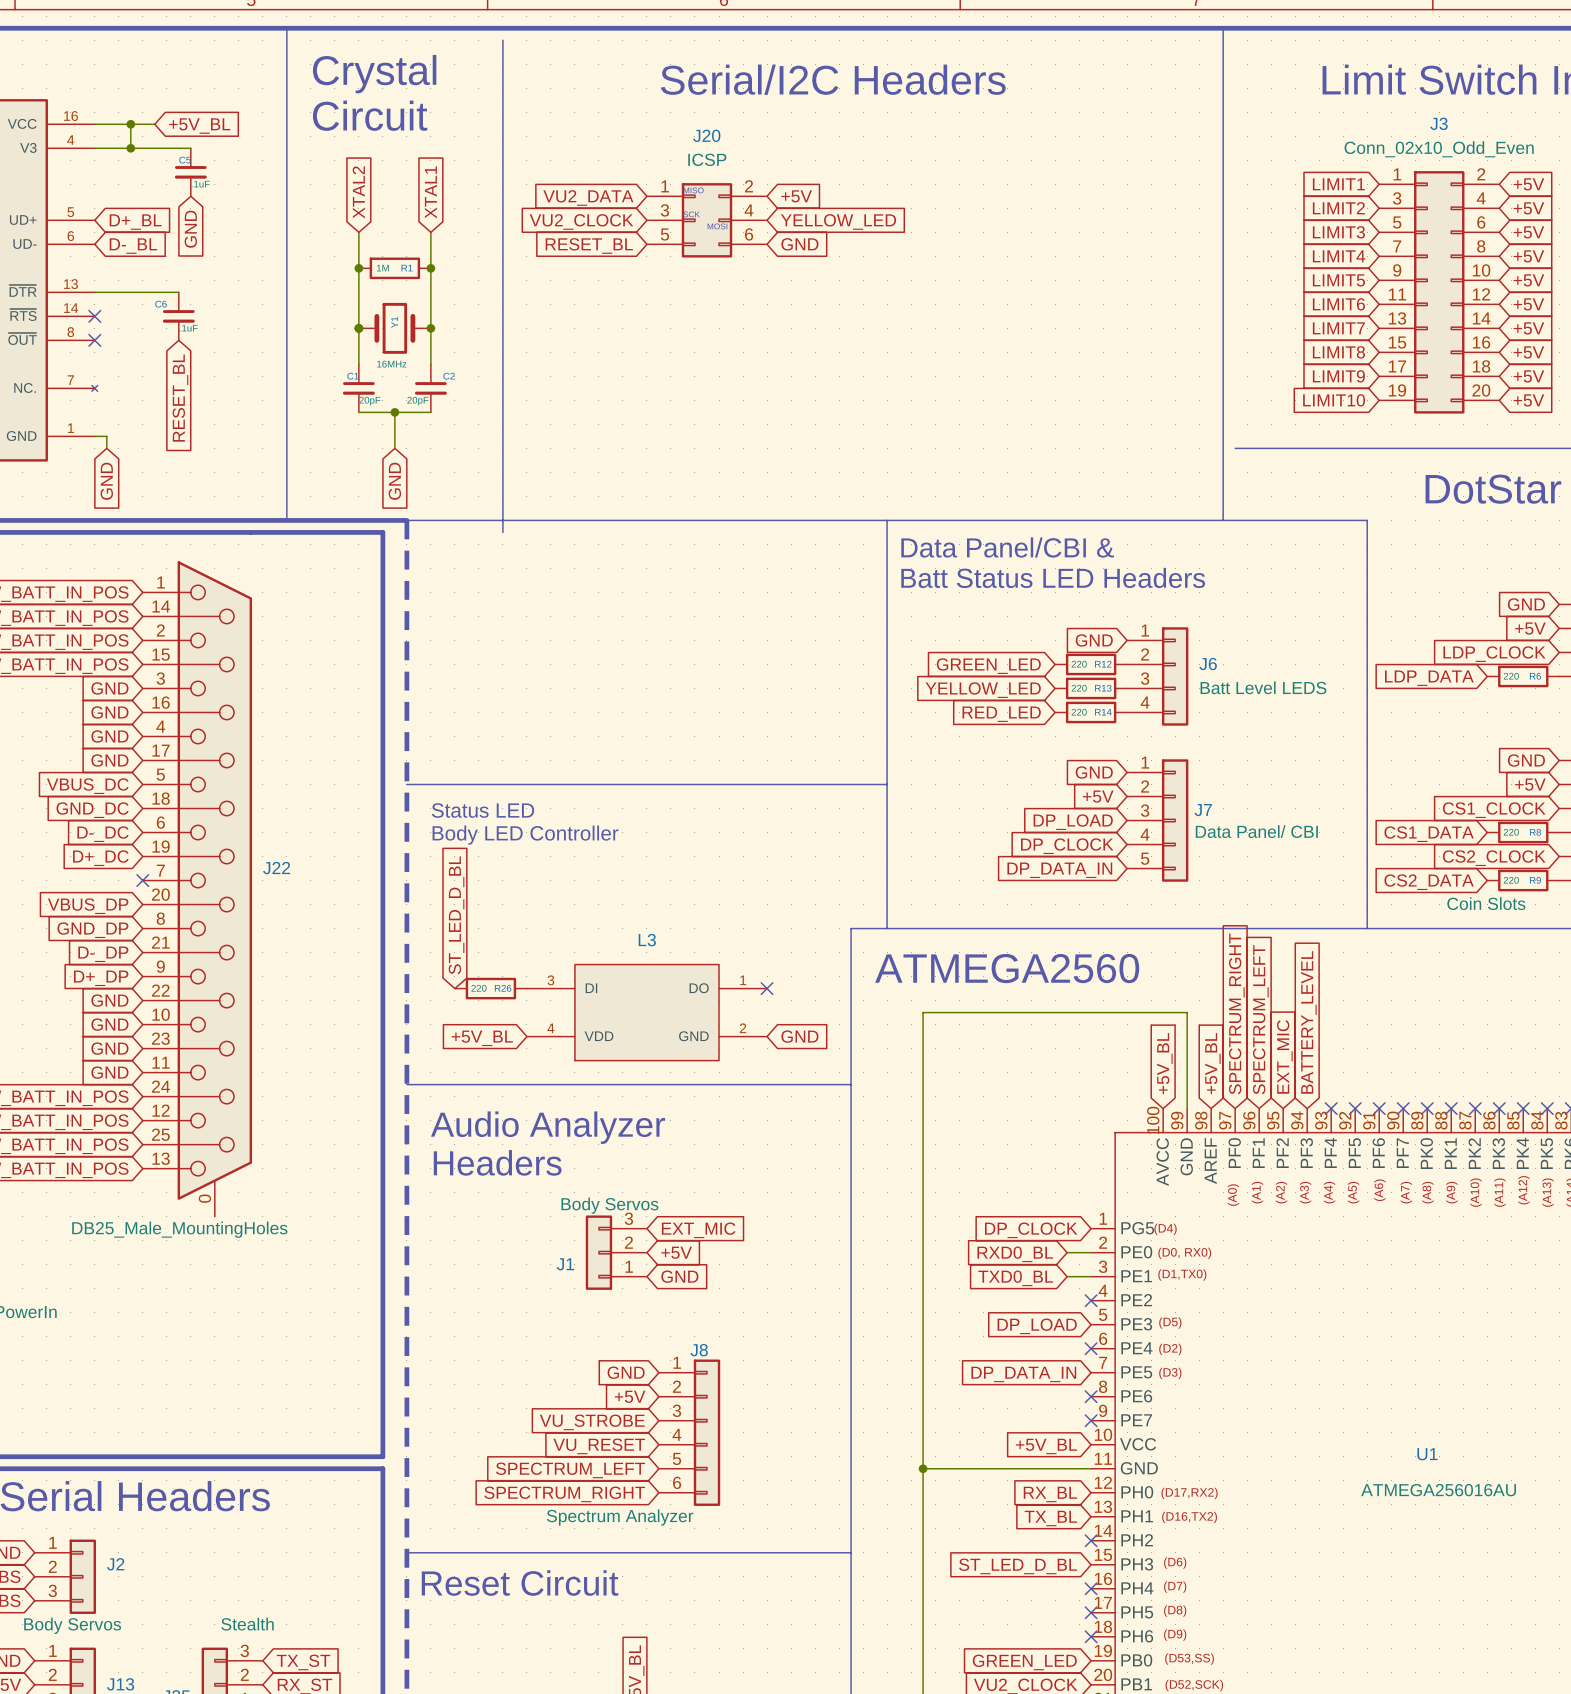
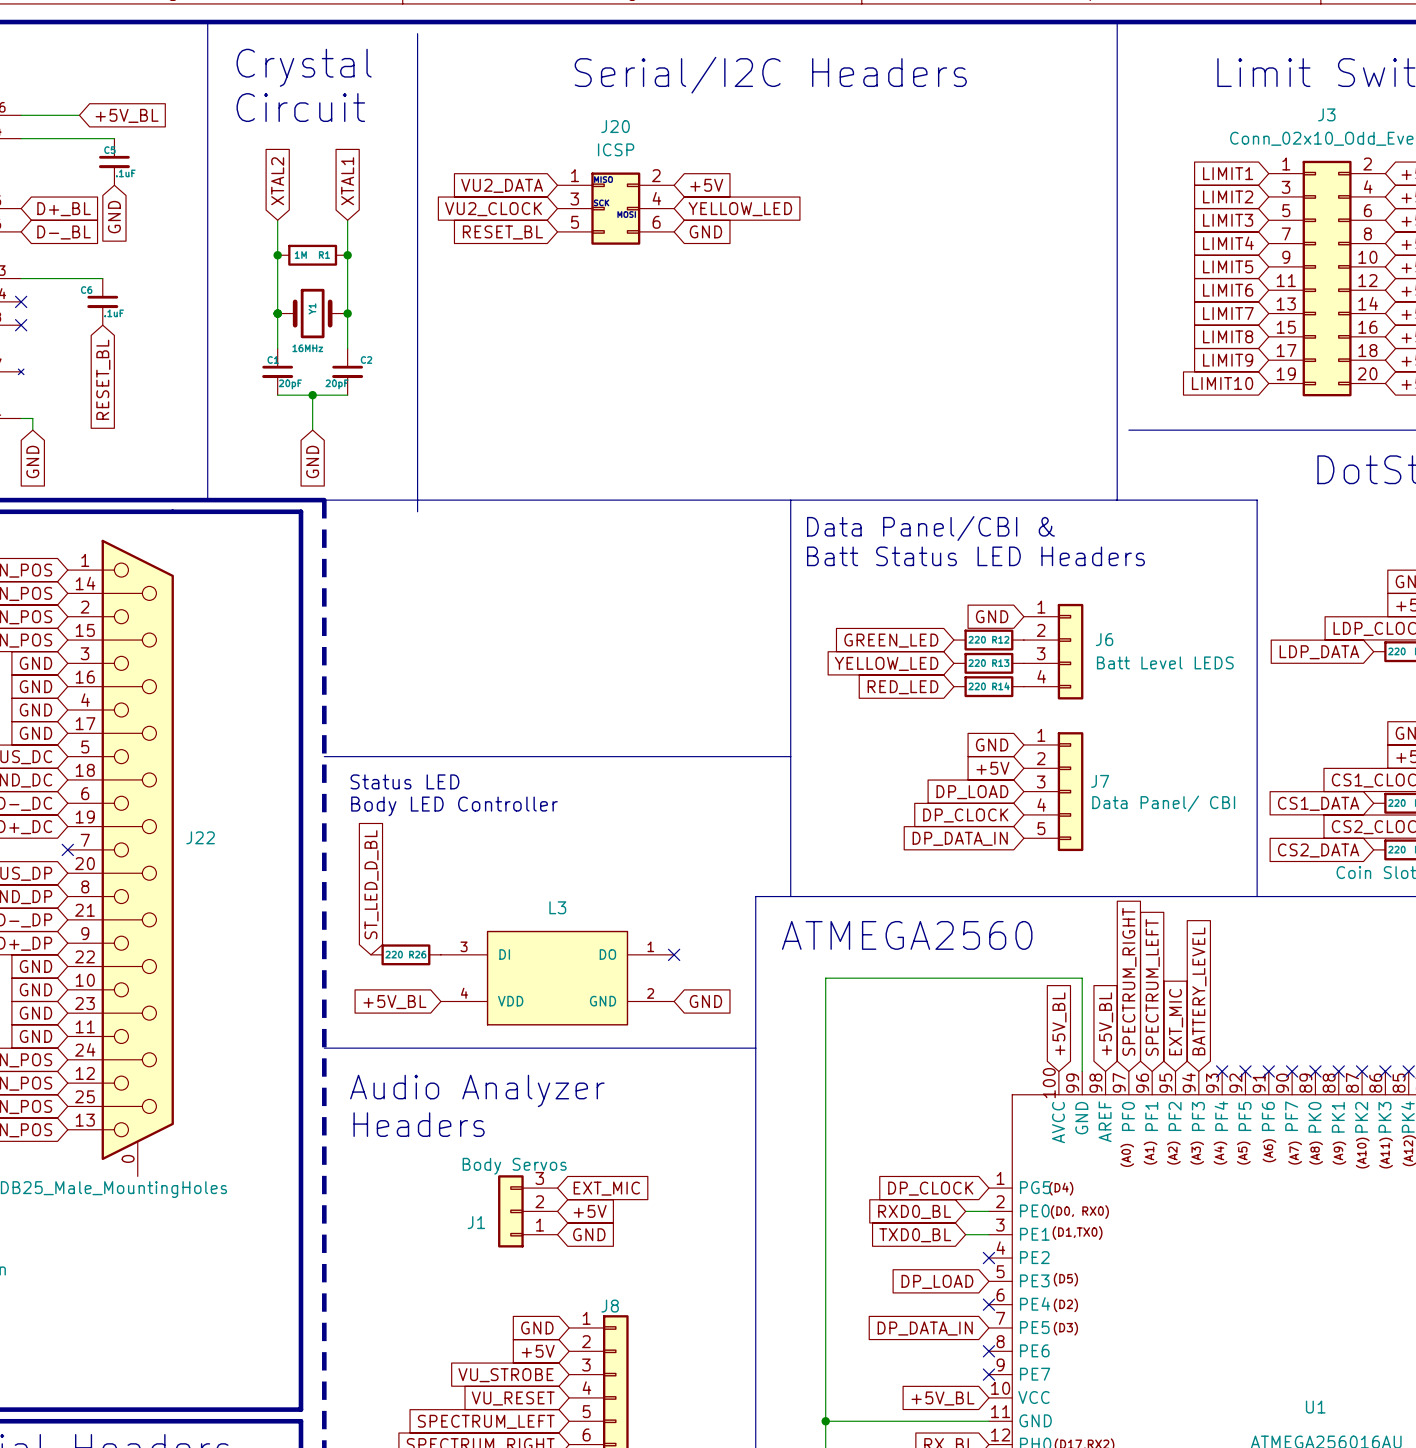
wire: (130, 124) (130, 148) -> none
junction: (130, 124) -> none
junction: (130, 148) -> none

